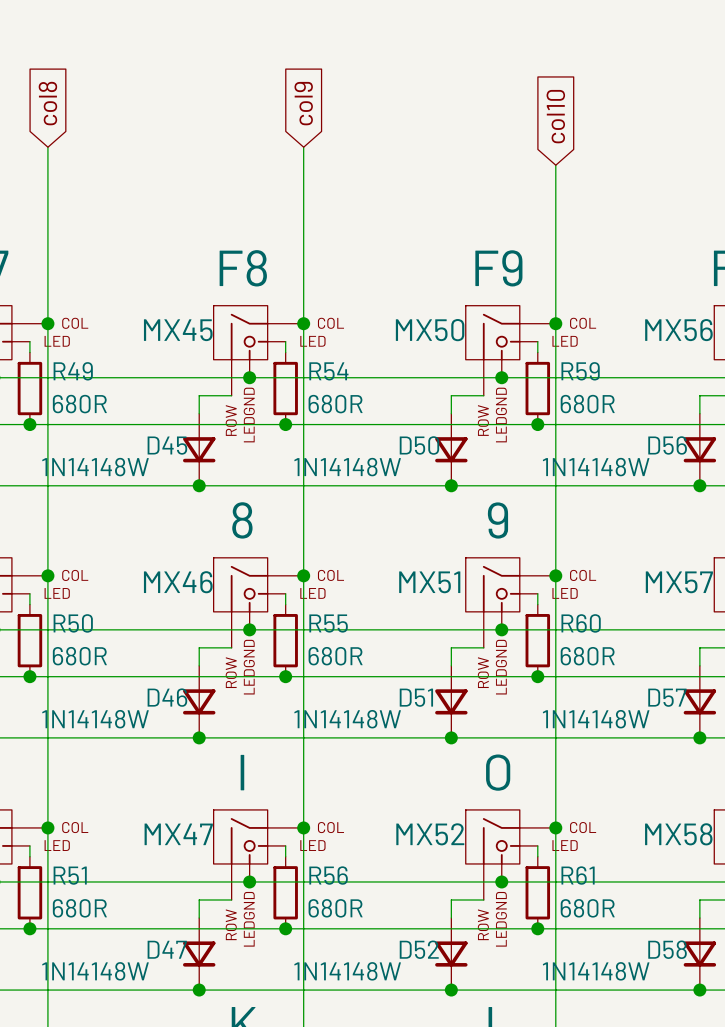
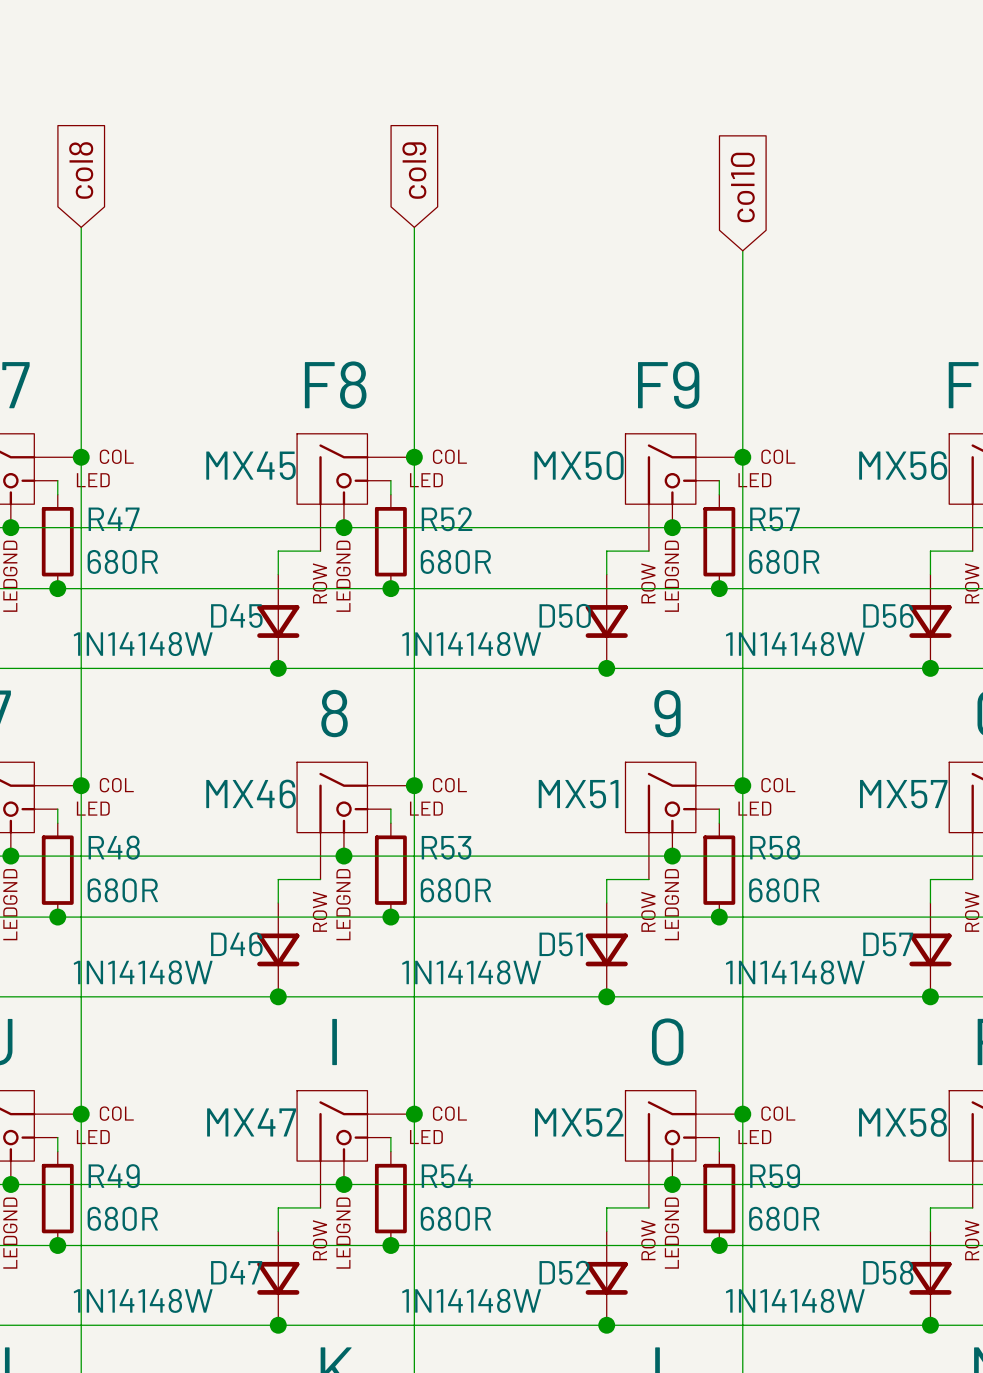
R49 name: R49 (73, 371) -> R47 (114, 519)
R54 name: R54 (328, 371) -> R52 (447, 519)
R59 name: R59 (580, 371) -> R57 (775, 519)
R50 name: R50 (73, 623) -> R48 (114, 847)
R55 name: R55 (328, 623) -> R53 (446, 847)
R60 name: R60 (581, 623) -> R58 (775, 847)
R51 name: R51 (70, 875) -> R49 (114, 1176)
R56 name: R56 (328, 875) -> R54 (447, 1176)
R61 name: R61 (578, 875) -> R59 (775, 1176)

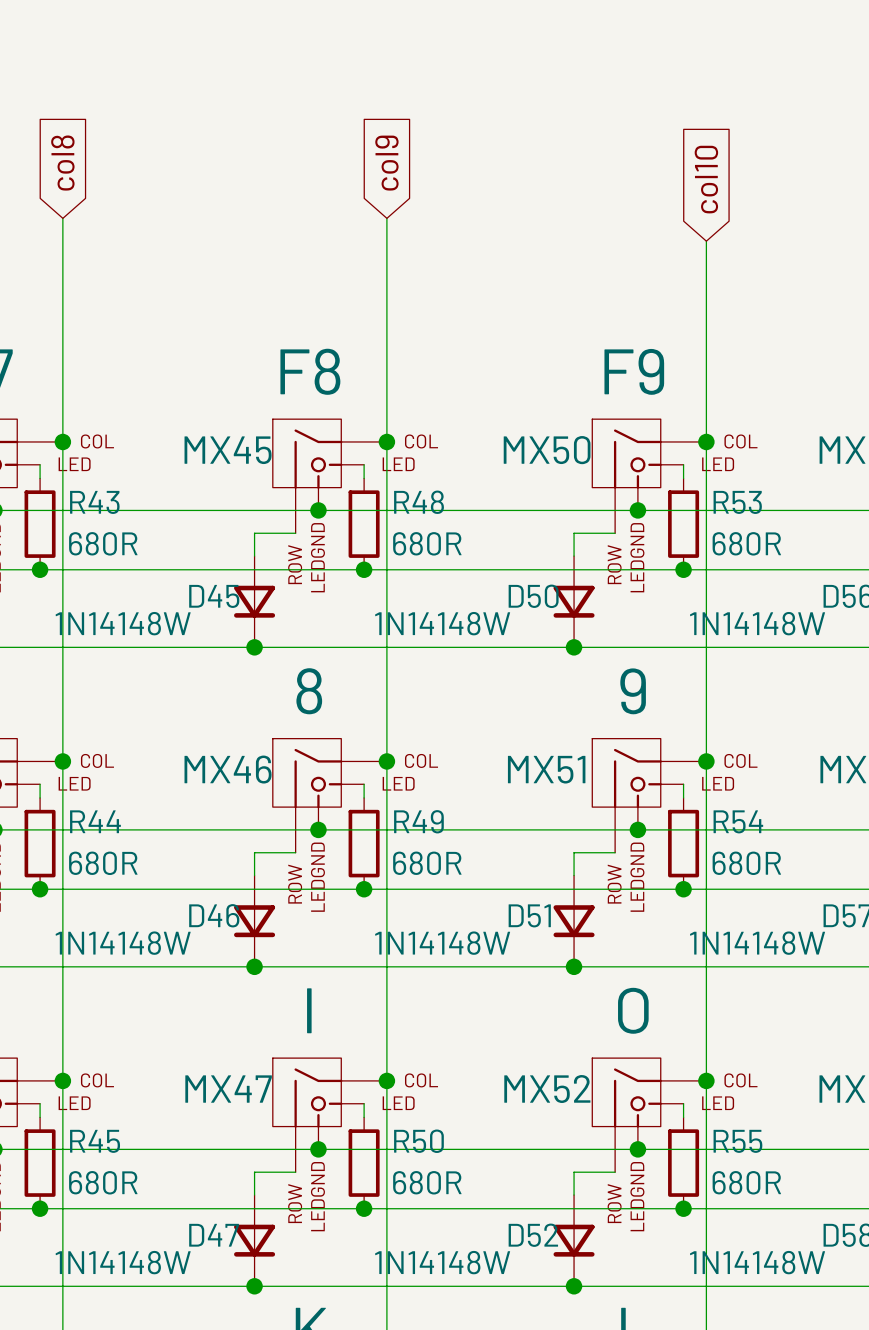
R47 name: R47 (114, 519) -> R43 (94, 502)
R52 name: R52 (447, 519) -> R48 (419, 502)
R57 name: R57 (775, 519) -> R53 (737, 502)
R48 name: R48 (114, 847) -> R44 (95, 821)
R53 name: R53 (446, 847) -> R49 (418, 821)
R58 name: R58 (775, 847) -> R54 (738, 821)
R49 name: R49 (114, 1176) -> R45 (95, 1141)
R54 name: R54 (447, 1176) -> R50 (418, 1141)
R59 name: R59 (775, 1176) -> R55 (737, 1141)

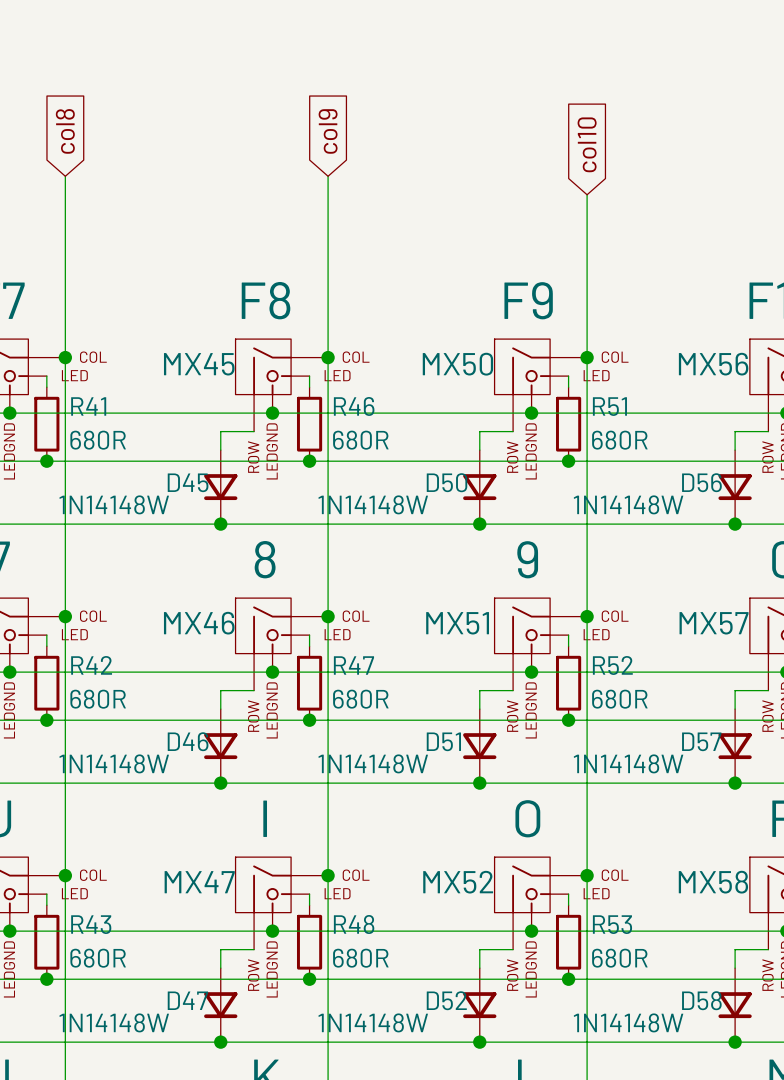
R43 name: R43 (94, 502) -> R41 (88, 406)
R48 name: R48 (419, 502) -> R46 (354, 406)
R53 name: R53 (737, 502) -> R51 (609, 406)
R44 name: R44 (95, 821) -> R42 (91, 665)
R49 name: R49 (418, 821) -> R47 (353, 665)
R54 name: R54 (738, 821) -> R52 (612, 665)
R45 name: R45 (95, 1141) -> R43 (91, 924)
R50 name: R50 (418, 1141) -> R48 (354, 924)
R55 name: R55 (737, 1141) -> R53 (612, 924)

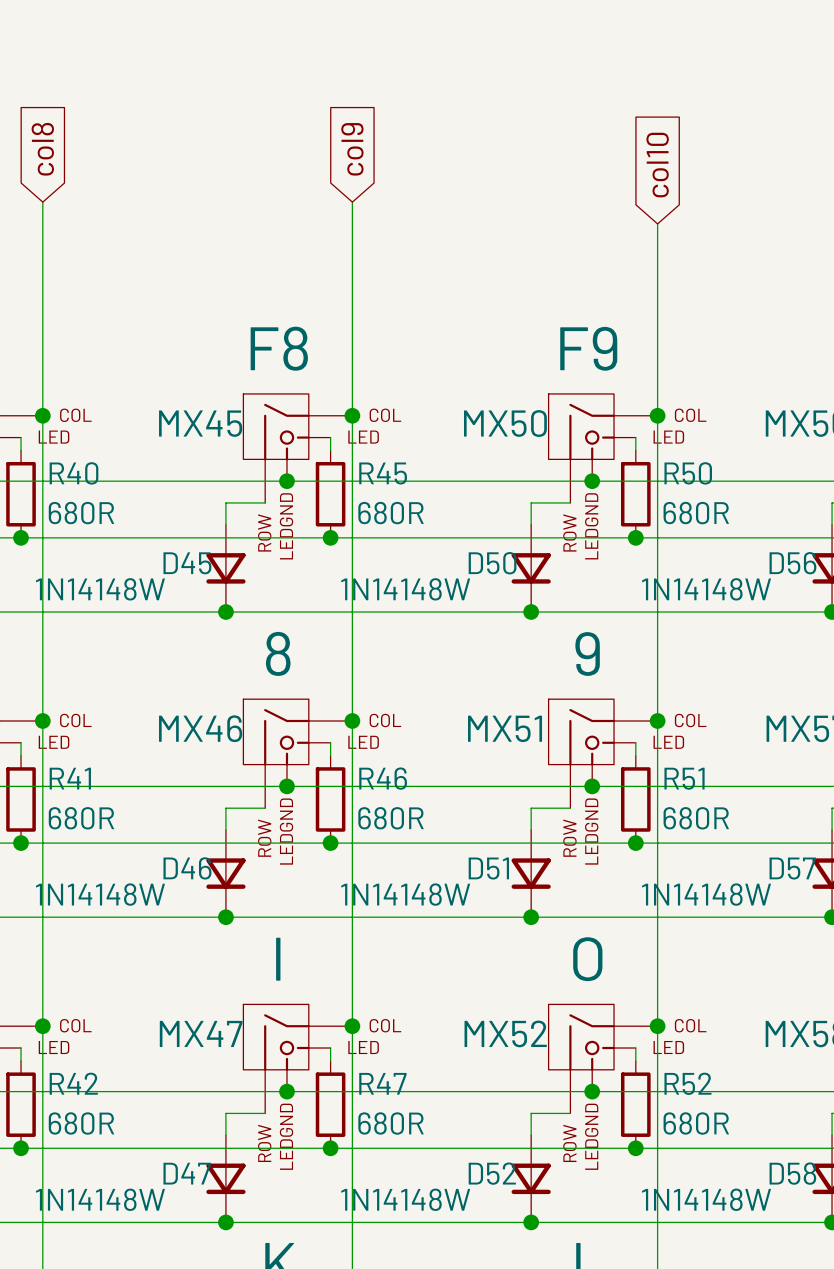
R41 name: R41 (88, 406) -> R40 (74, 473)
R46 name: R46 (354, 406) -> R45 (383, 473)
R51 name: R51 (609, 406) -> R50 (688, 473)
R42 name: R42 (91, 665) -> R41 (70, 778)
R47 name: R47 (353, 665) -> R46 (383, 778)
R52 name: R52 (612, 665) -> R51 (684, 778)
R43 name: R43 (91, 924) -> R42 (73, 1083)
R48 name: R48 (354, 924) -> R47 (382, 1083)
R53 name: R53 (612, 924) -> R52 (687, 1083)

